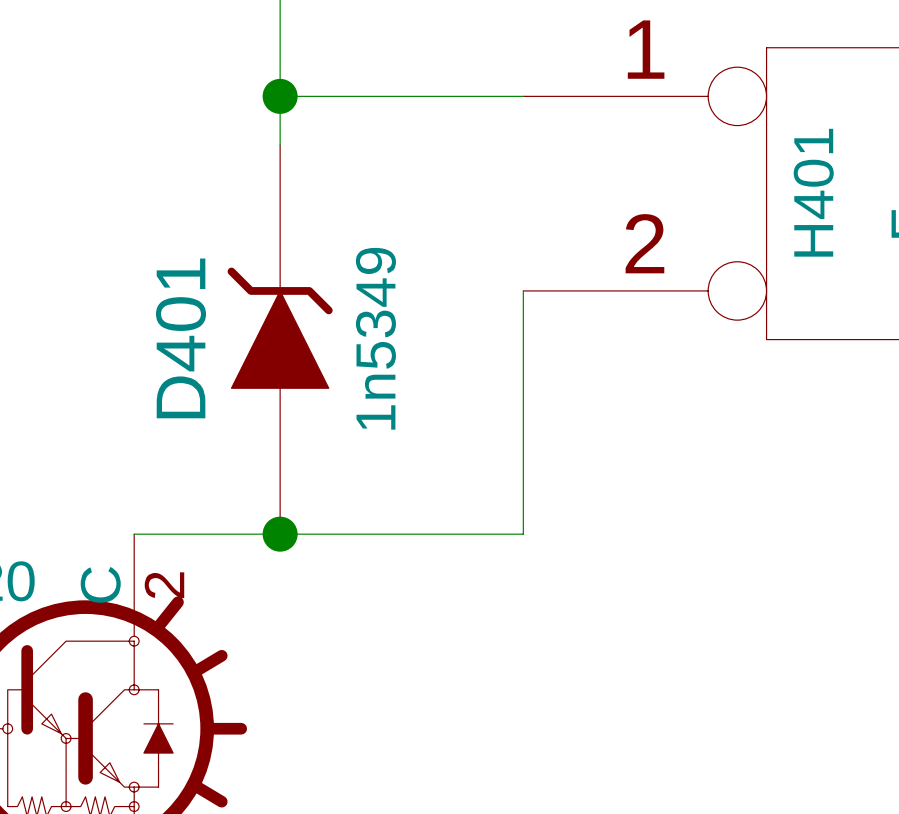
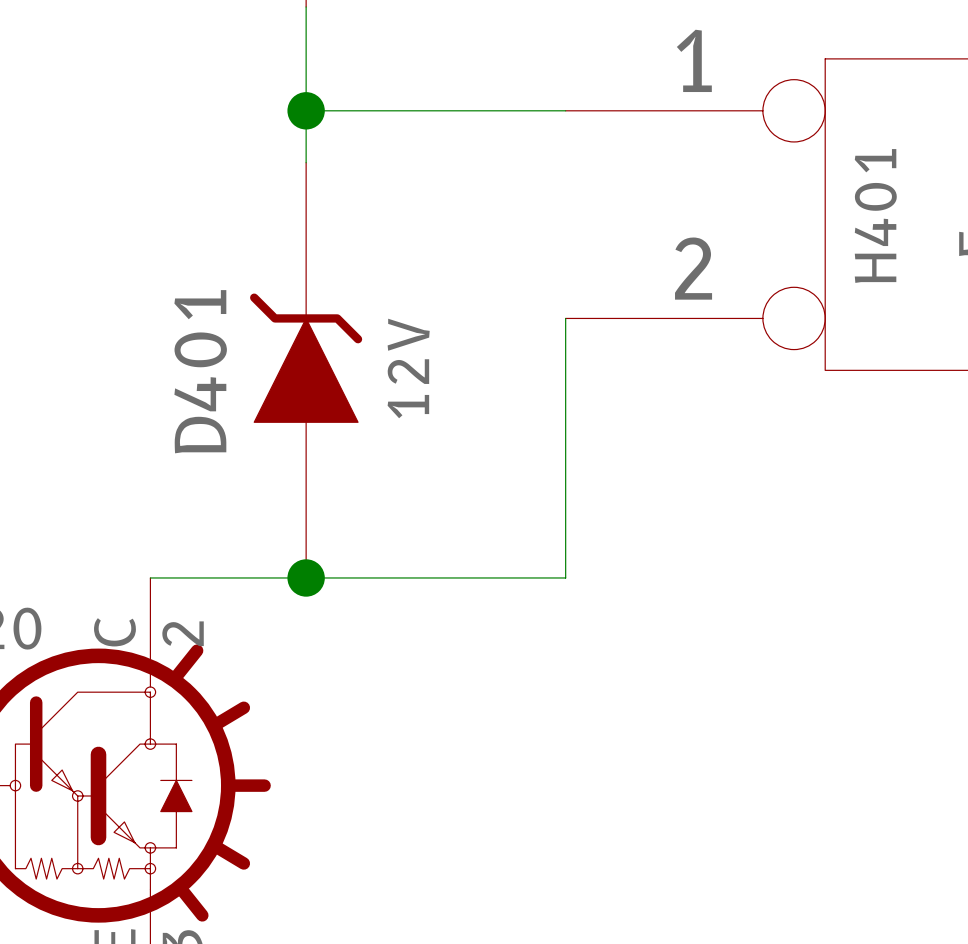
D401 value: 1n5349 (375, 338) -> 12V (408, 368)

